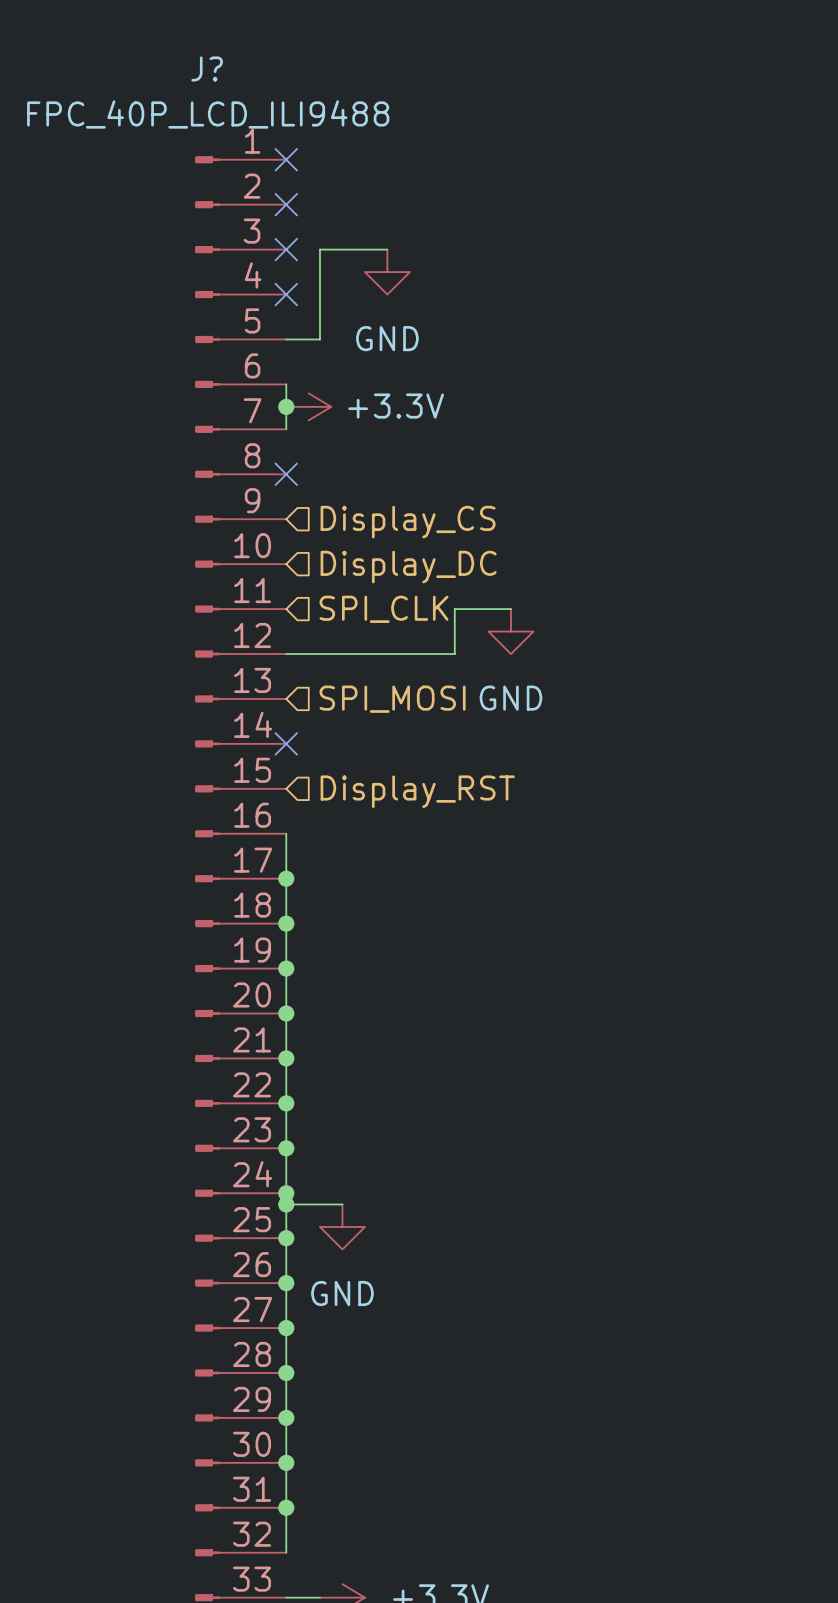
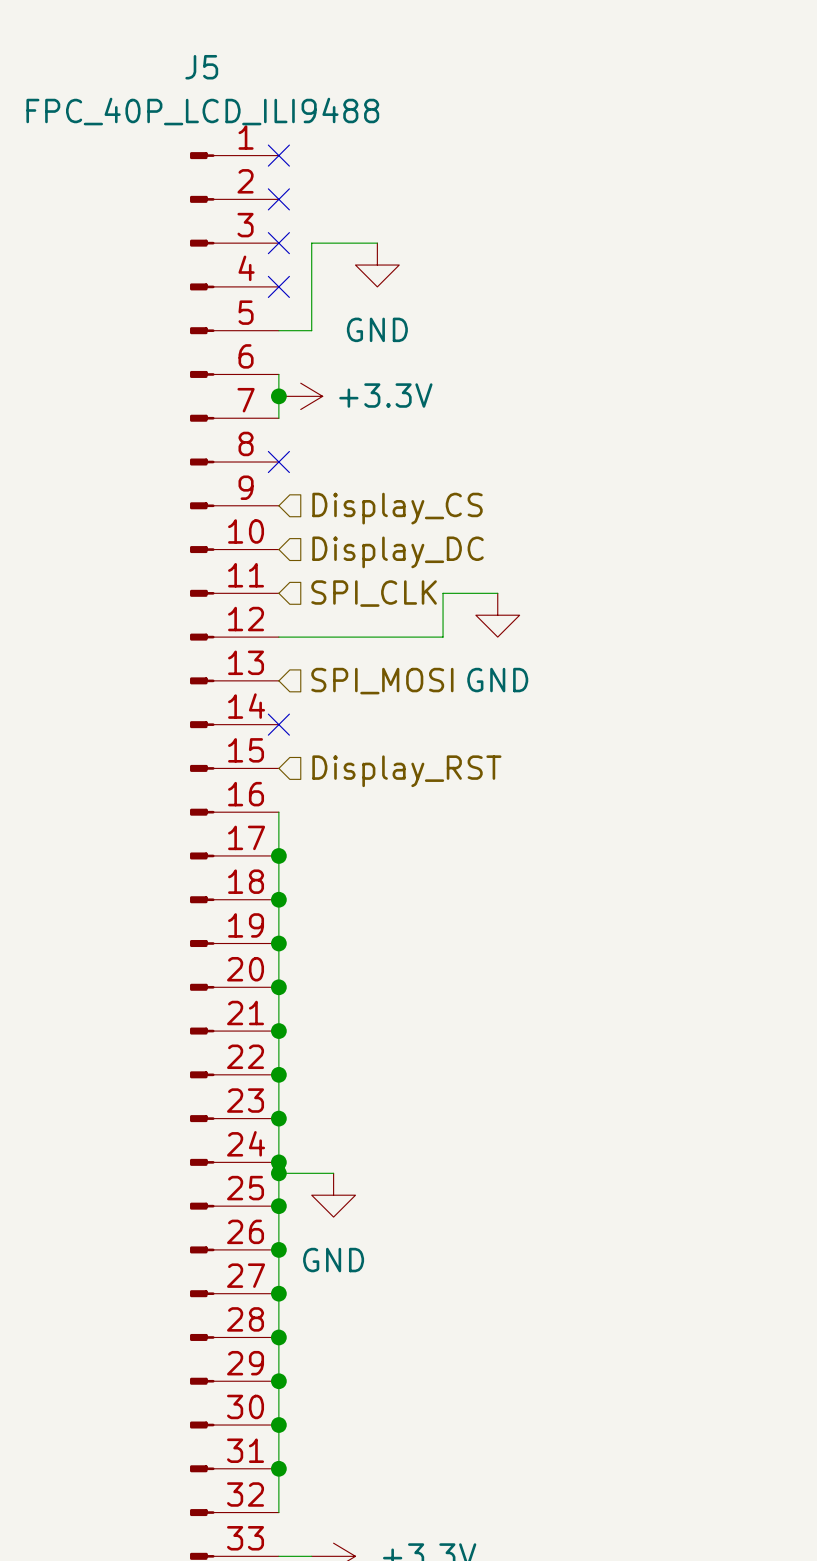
J? name: J? (207, 69) -> J5 (201, 67)

